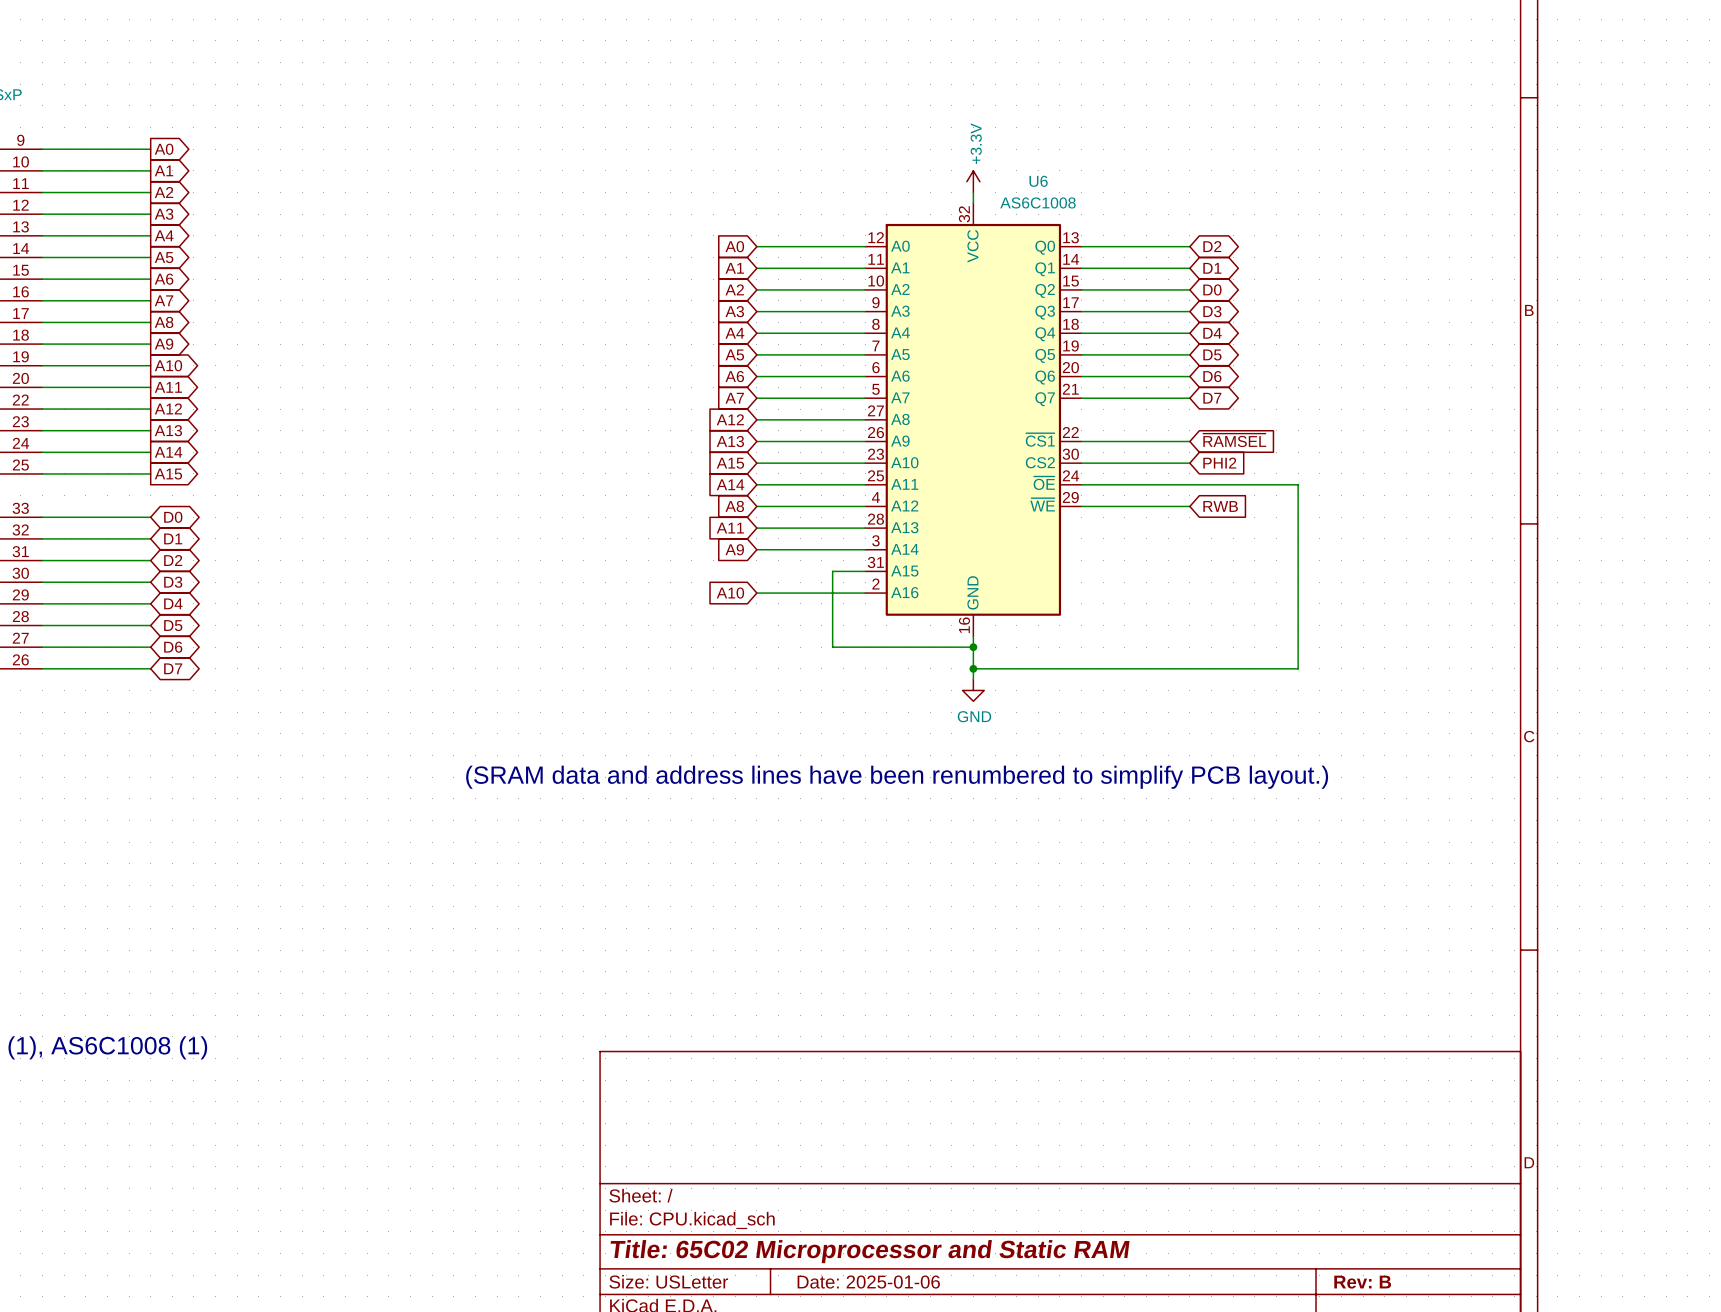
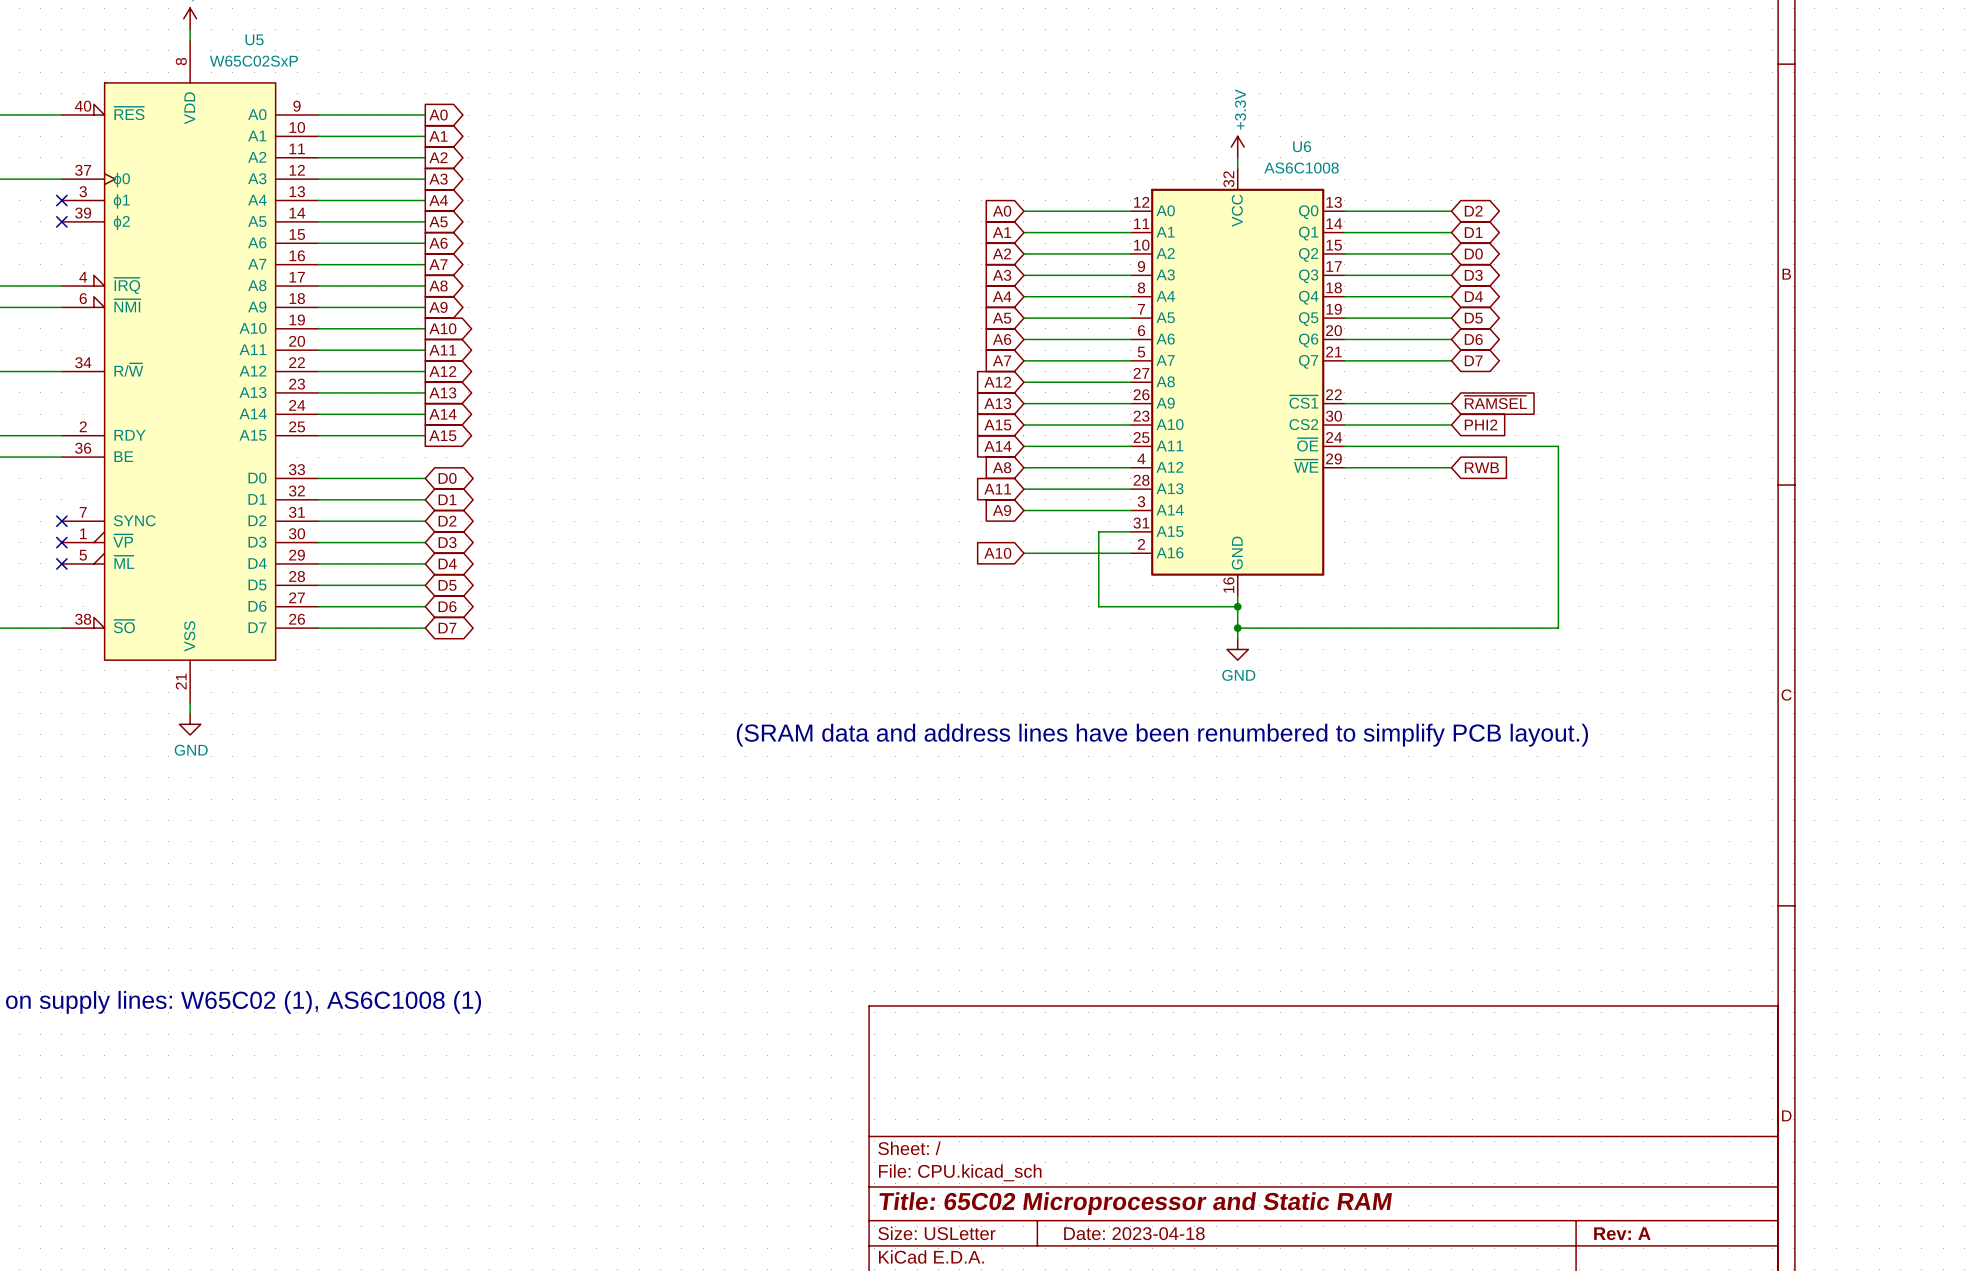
title block: Date: 2025-01-06 (868, 1282) -> Date: 2023-04-18 (1134, 1233)
title block: Rev: B (1362, 1282) -> Rev: A (1622, 1233)

